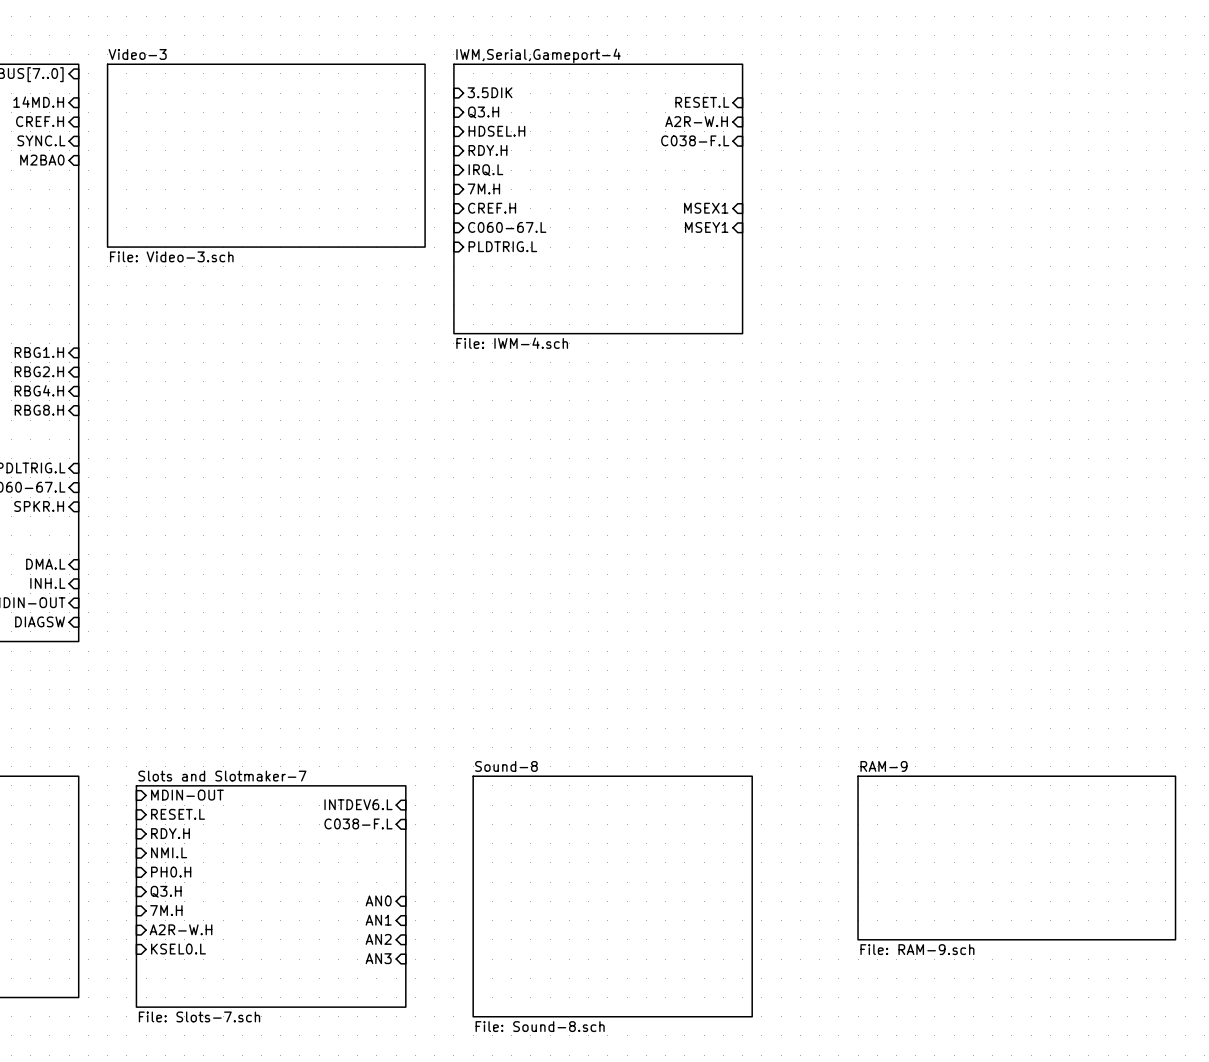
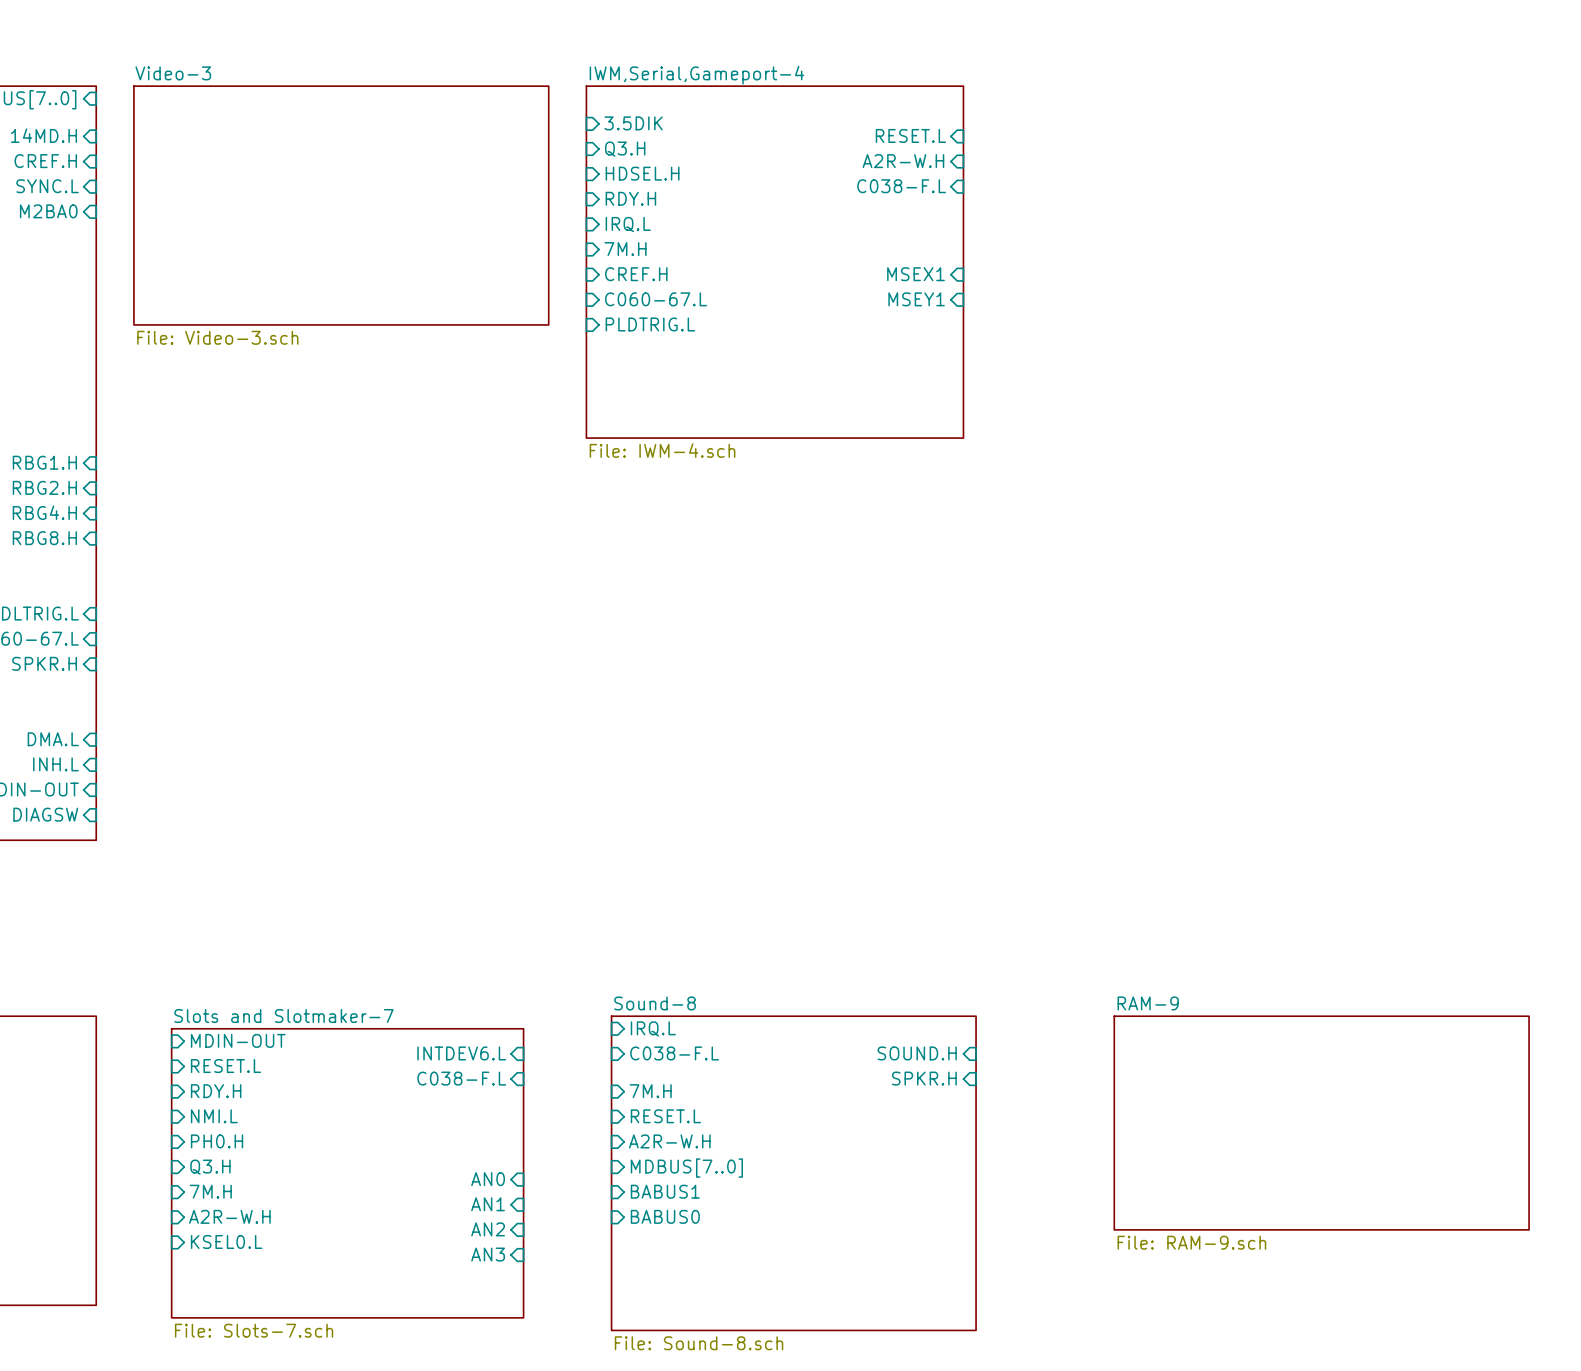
sheet pin: none -> IRQ.L (653, 1028)
sheet pin: none -> C038-F.L (674, 1053)
sheet pin: none -> SOUND.H (917, 1053)
sheet pin: none -> SPKR.H (924, 1078)
sheet pin: none -> 7M.H (650, 1091)
sheet pin: none -> RESET.L (665, 1116)
sheet pin: none -> A2R-W.H (669, 1141)
sheet pin: none -> MDBUS[7..0] (686, 1168)
sheet pin: none -> BABUS1 (665, 1191)
sheet pin: none -> BABUS0 (665, 1216)

